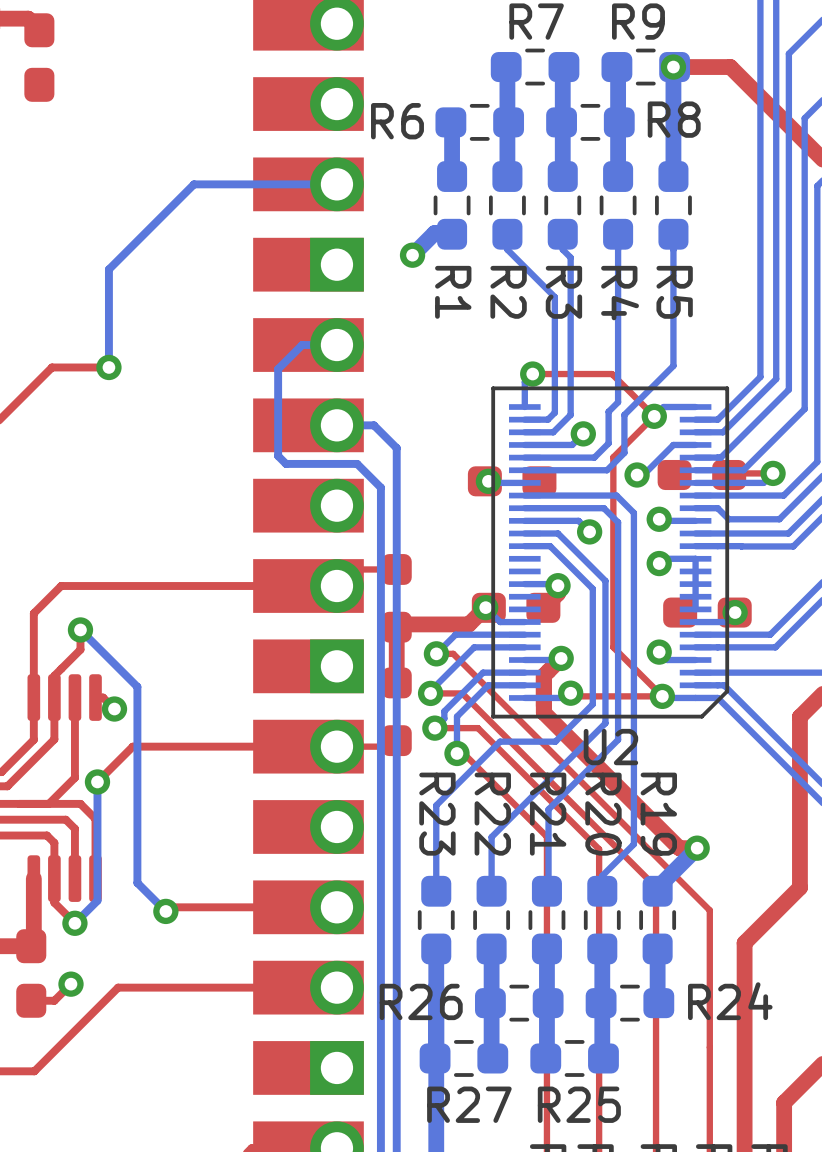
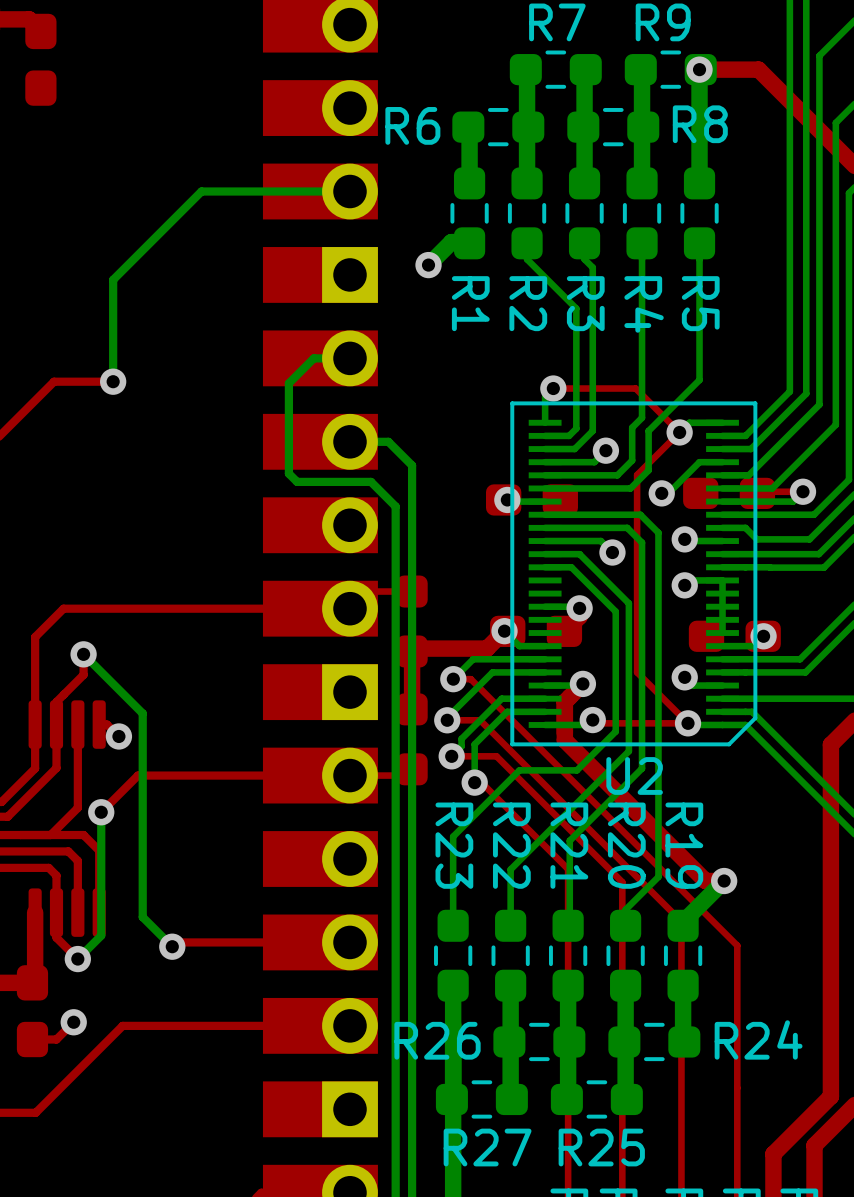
top track: (799, 887) (744, 943) (744, 1110) -> (830, 922) (830, 1096) (773, 1153)

